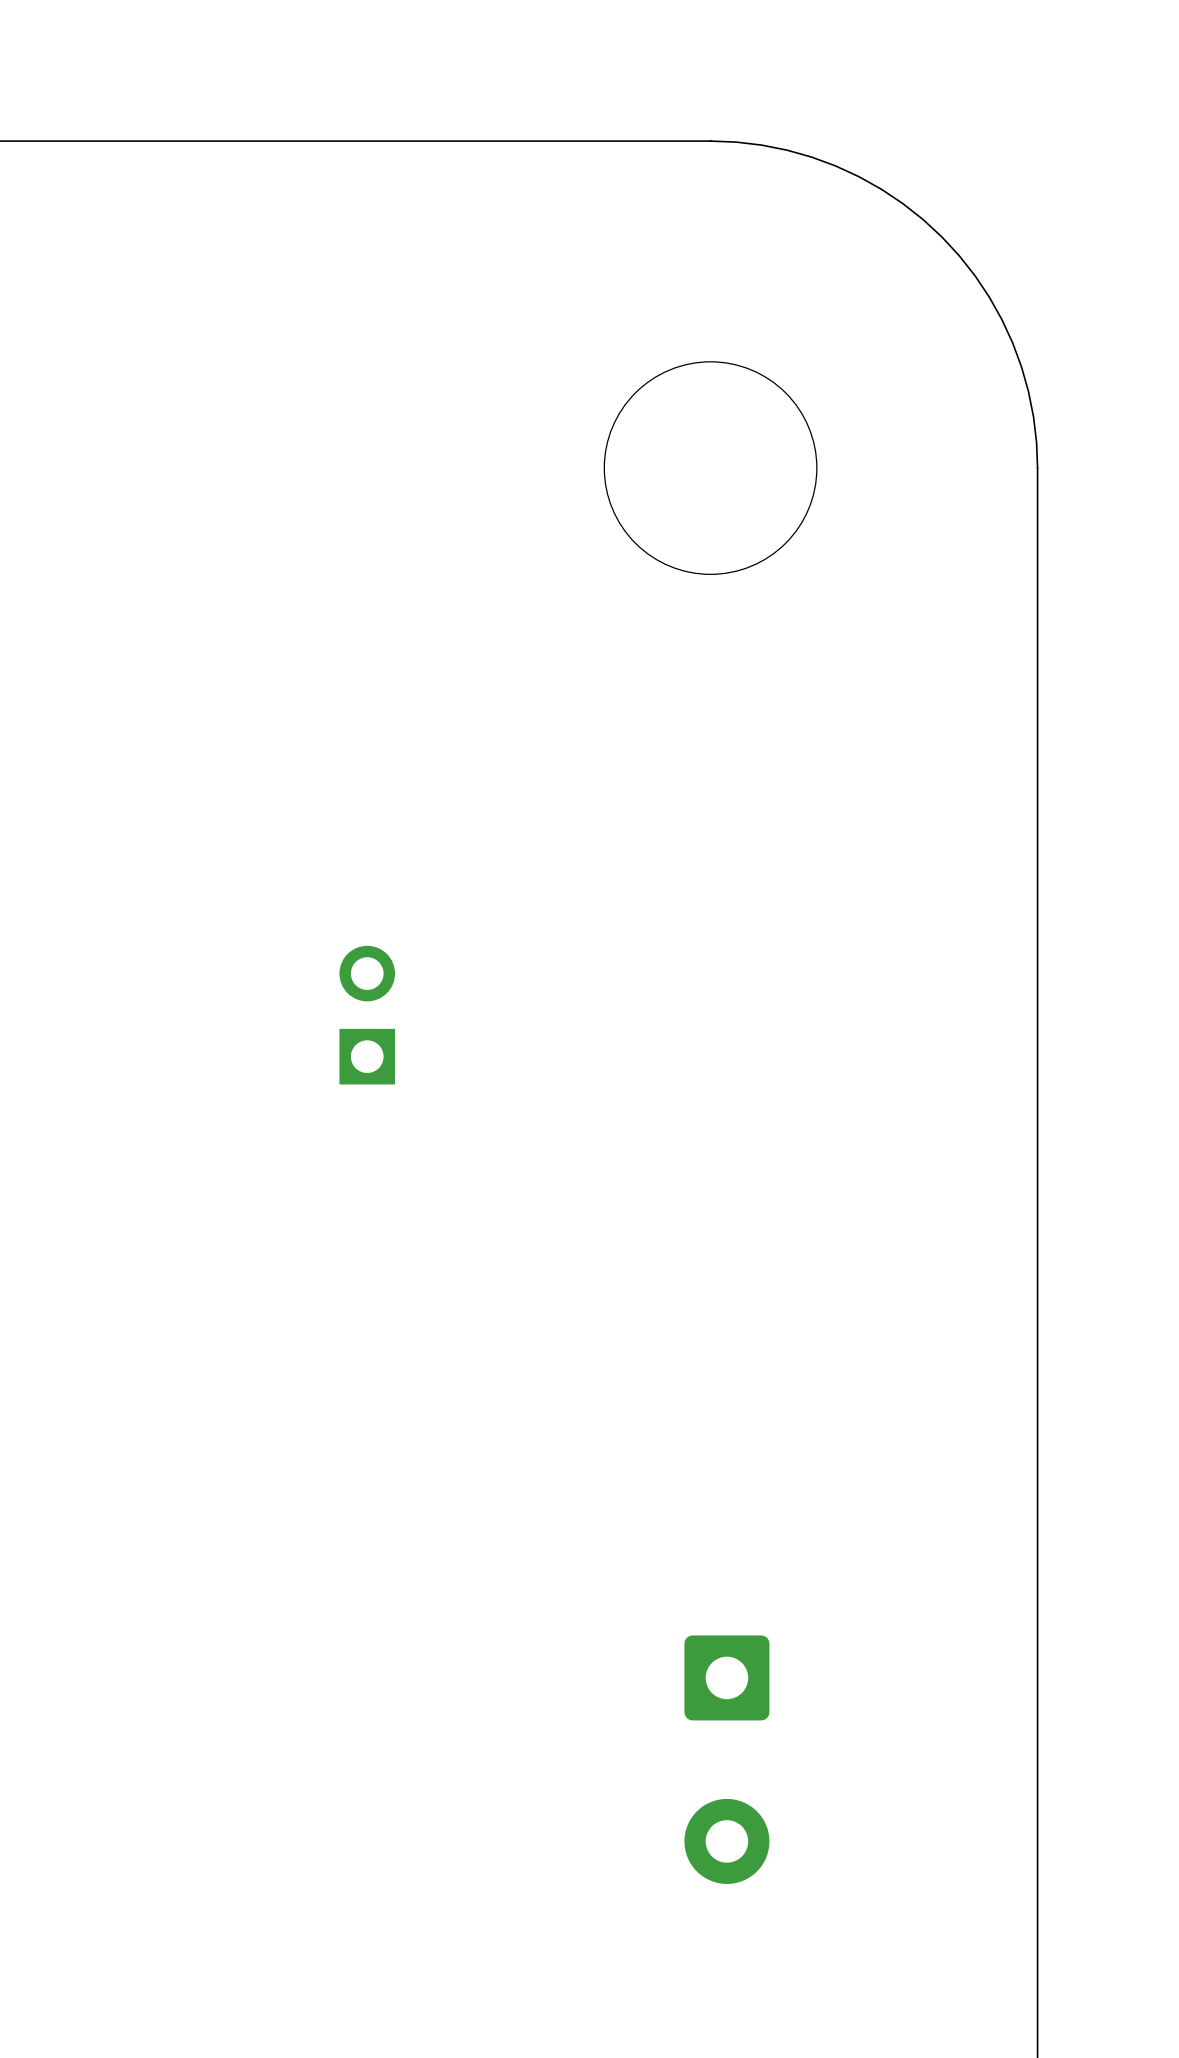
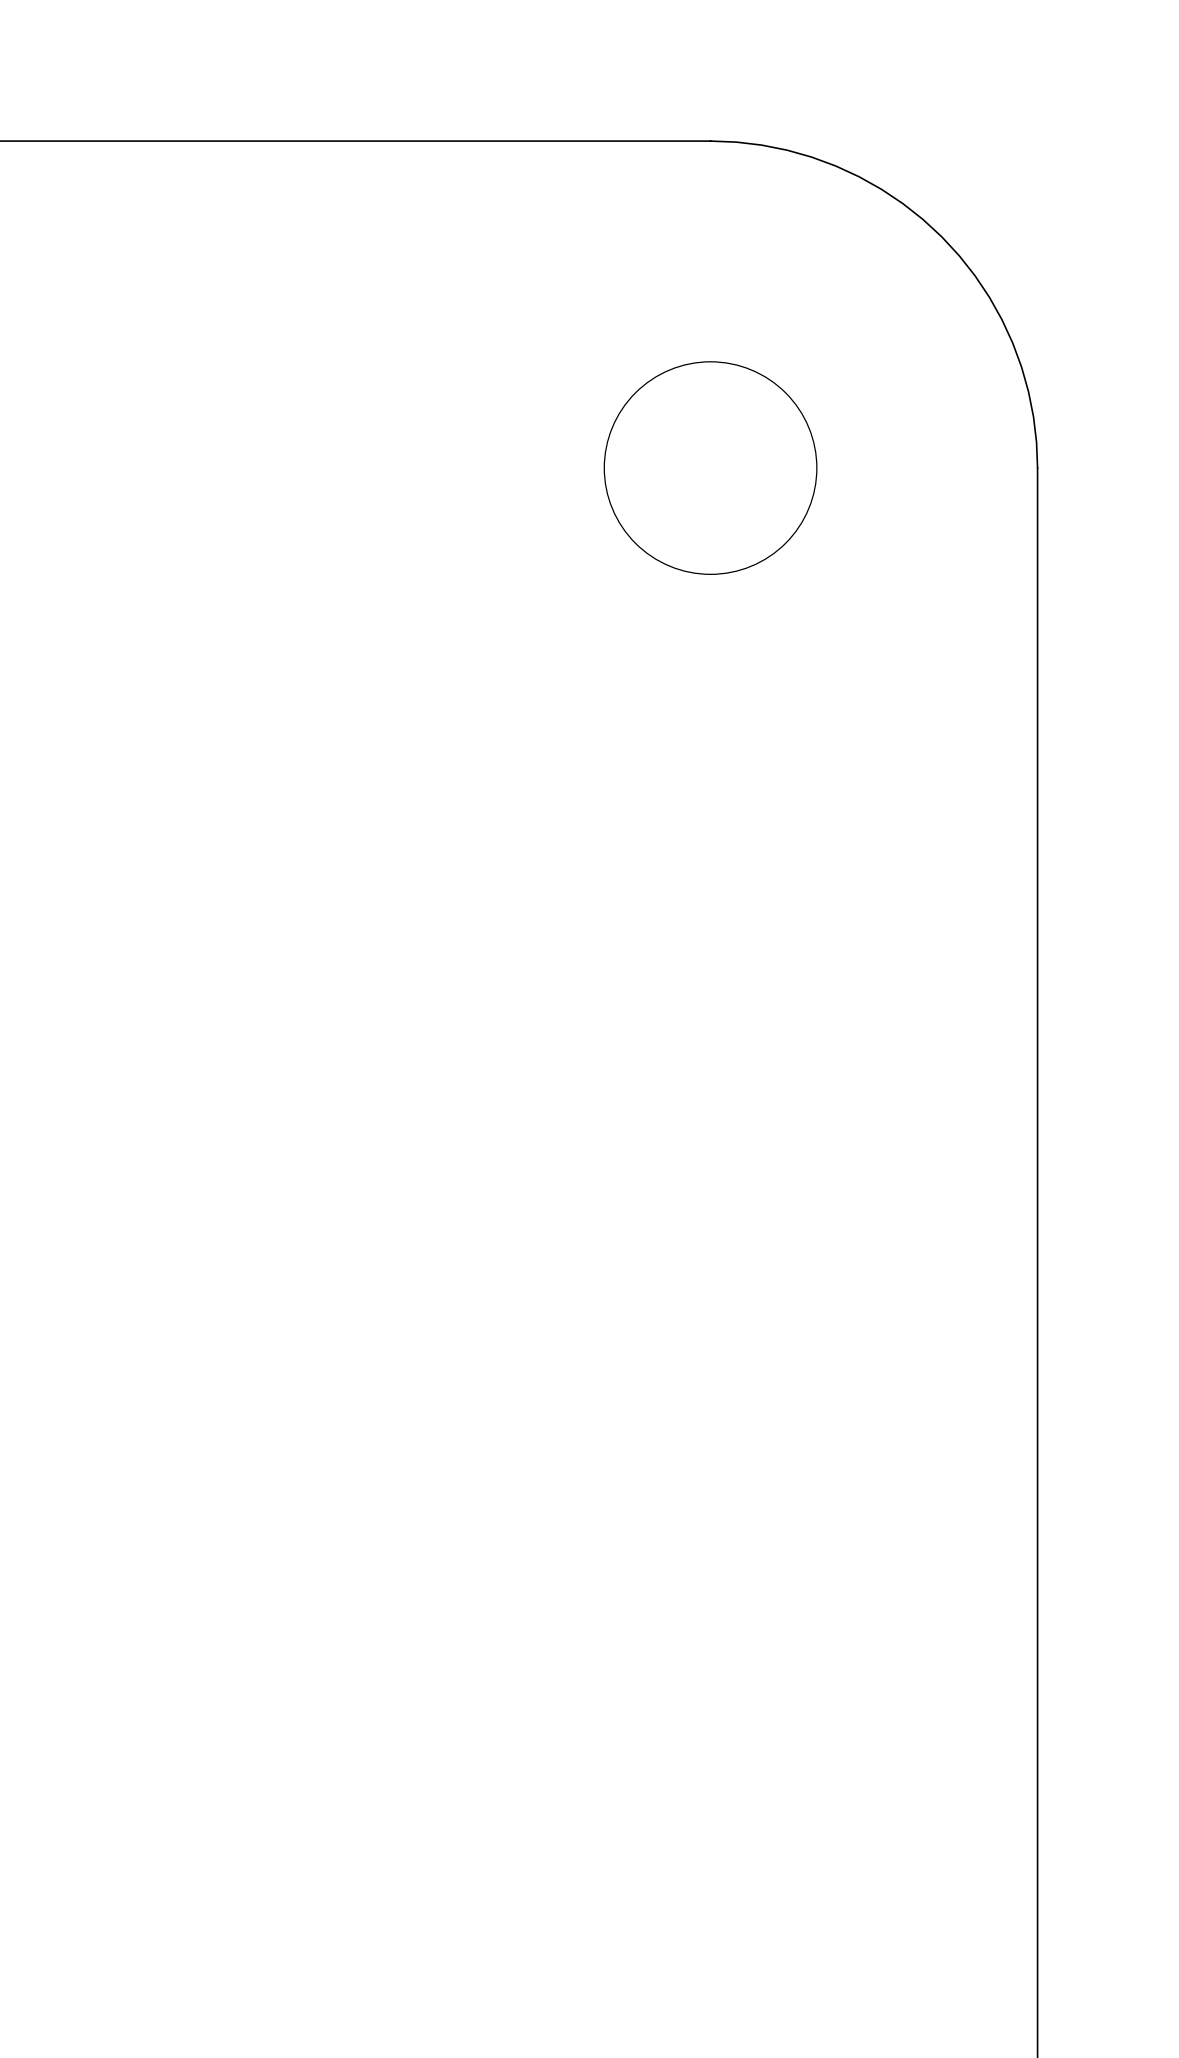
part: (367, 1015) -> none
part: (726, 1759) -> none

